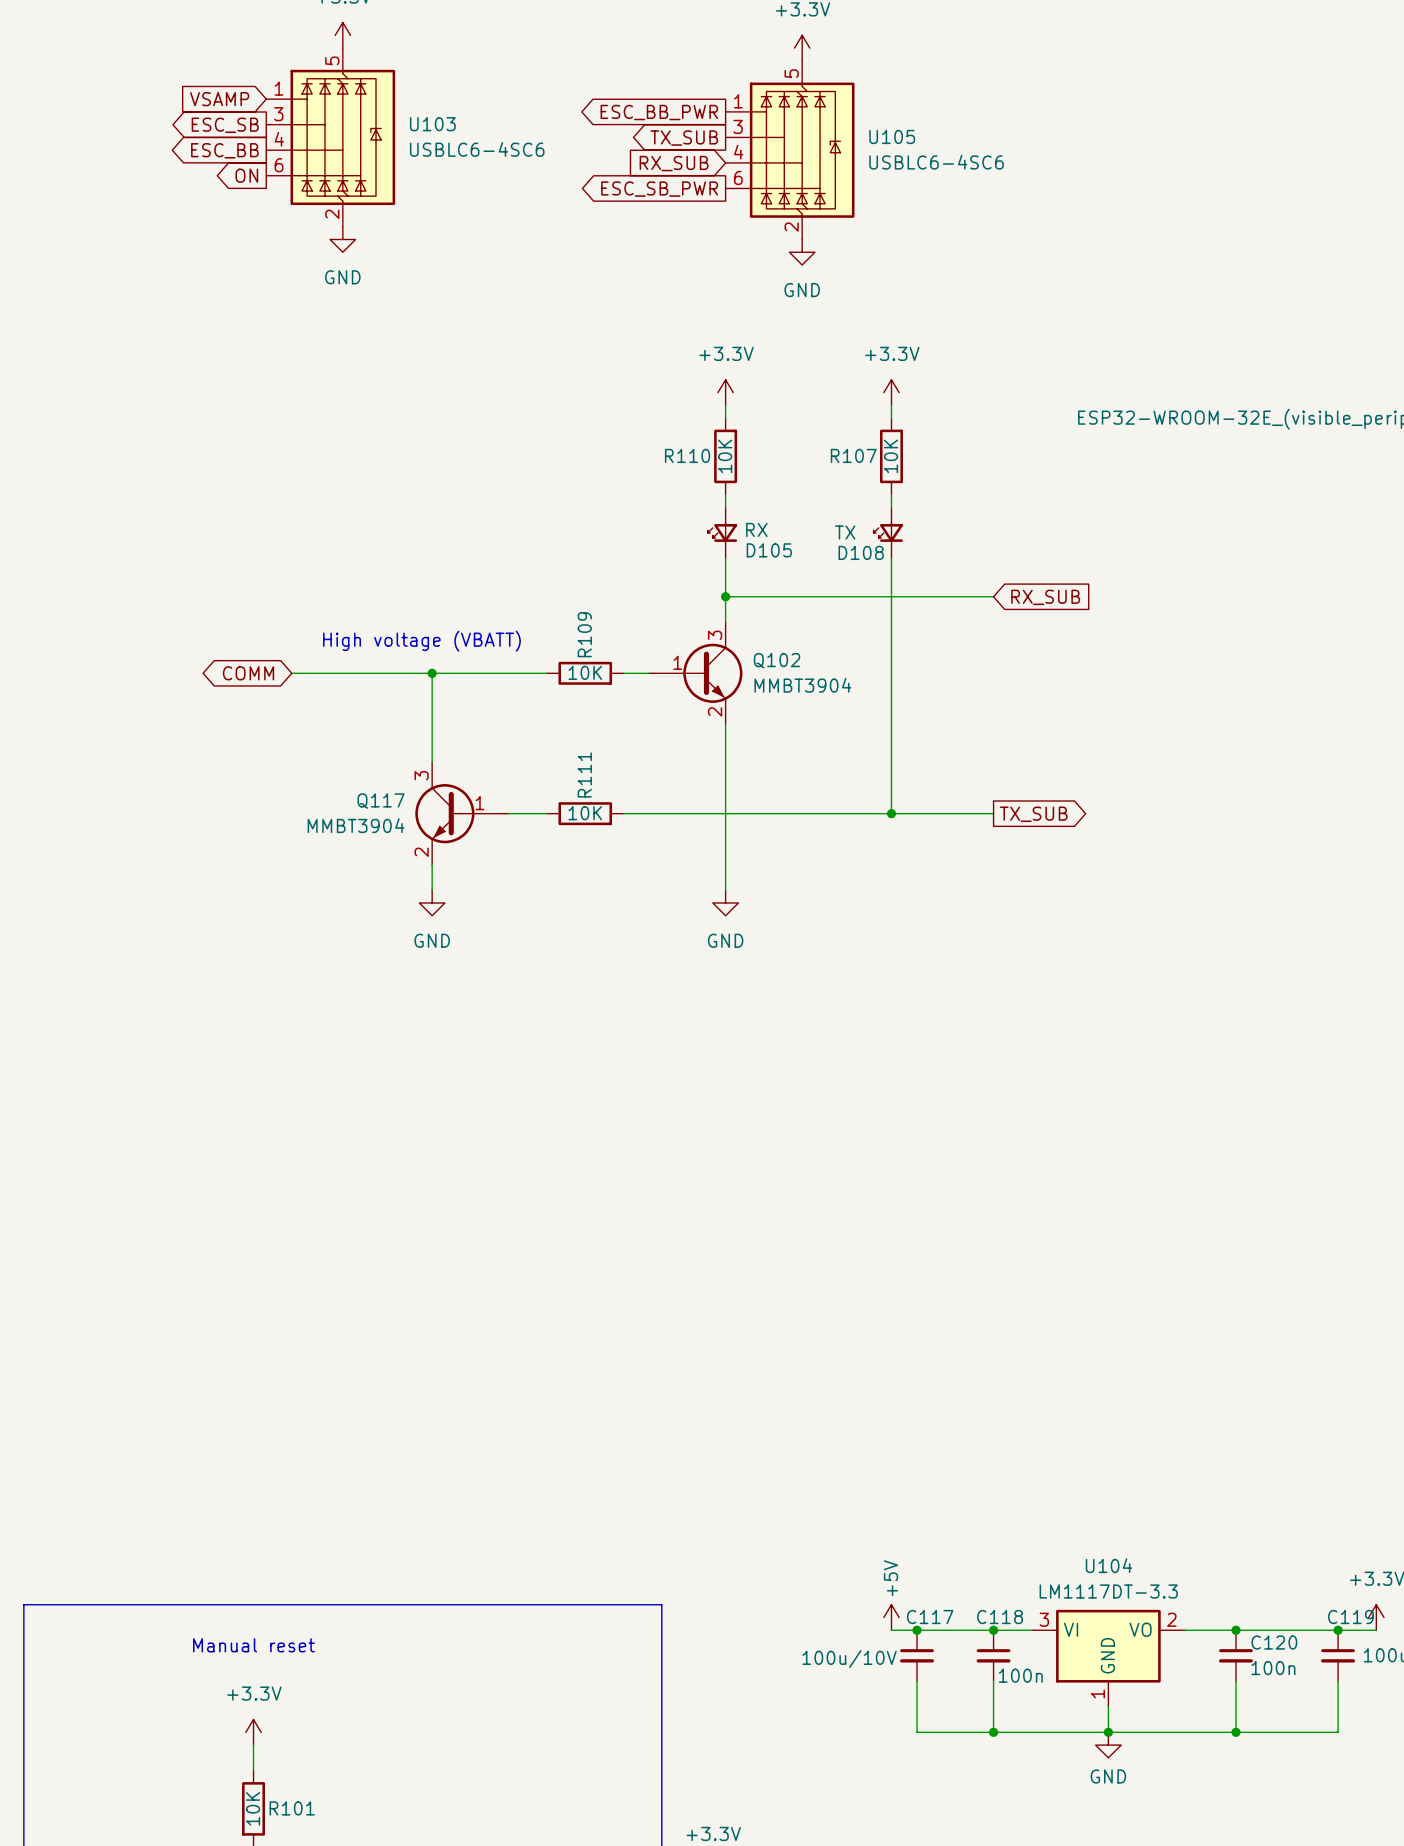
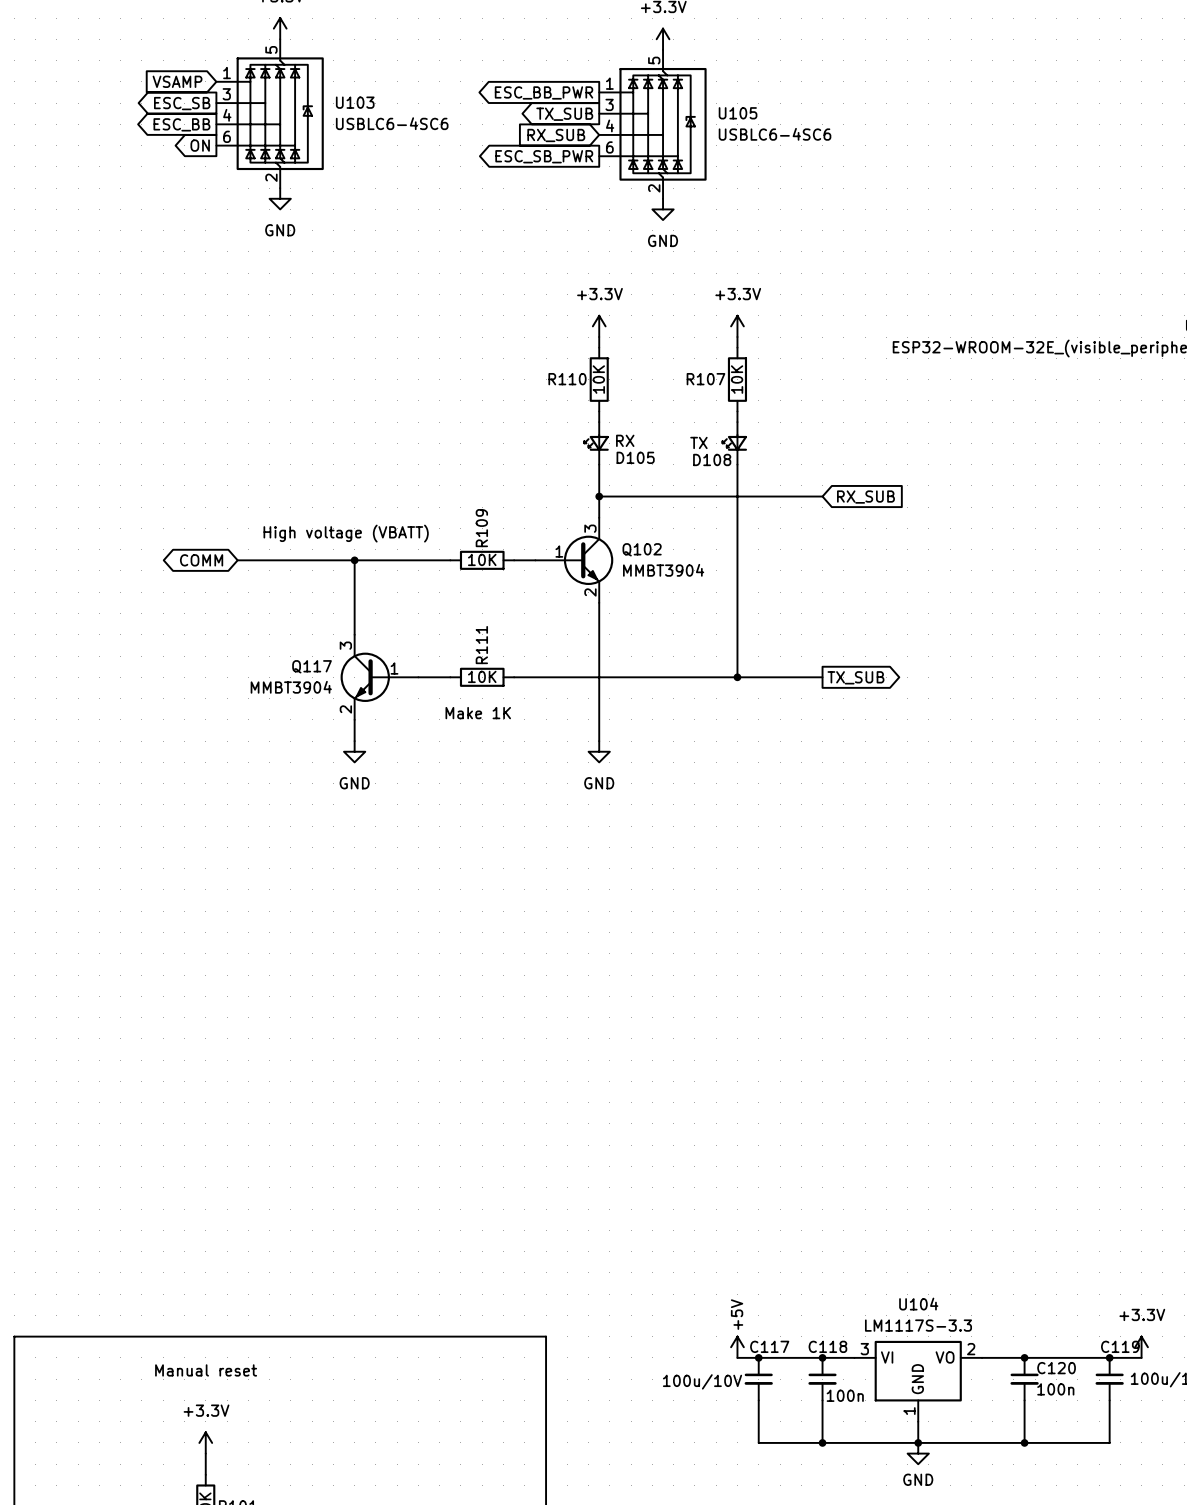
text: none -> Make 1K (478, 713)
U104 value: LM1117DT-3.3 (1108, 1591) -> LM1117S-3.3 (918, 1325)

